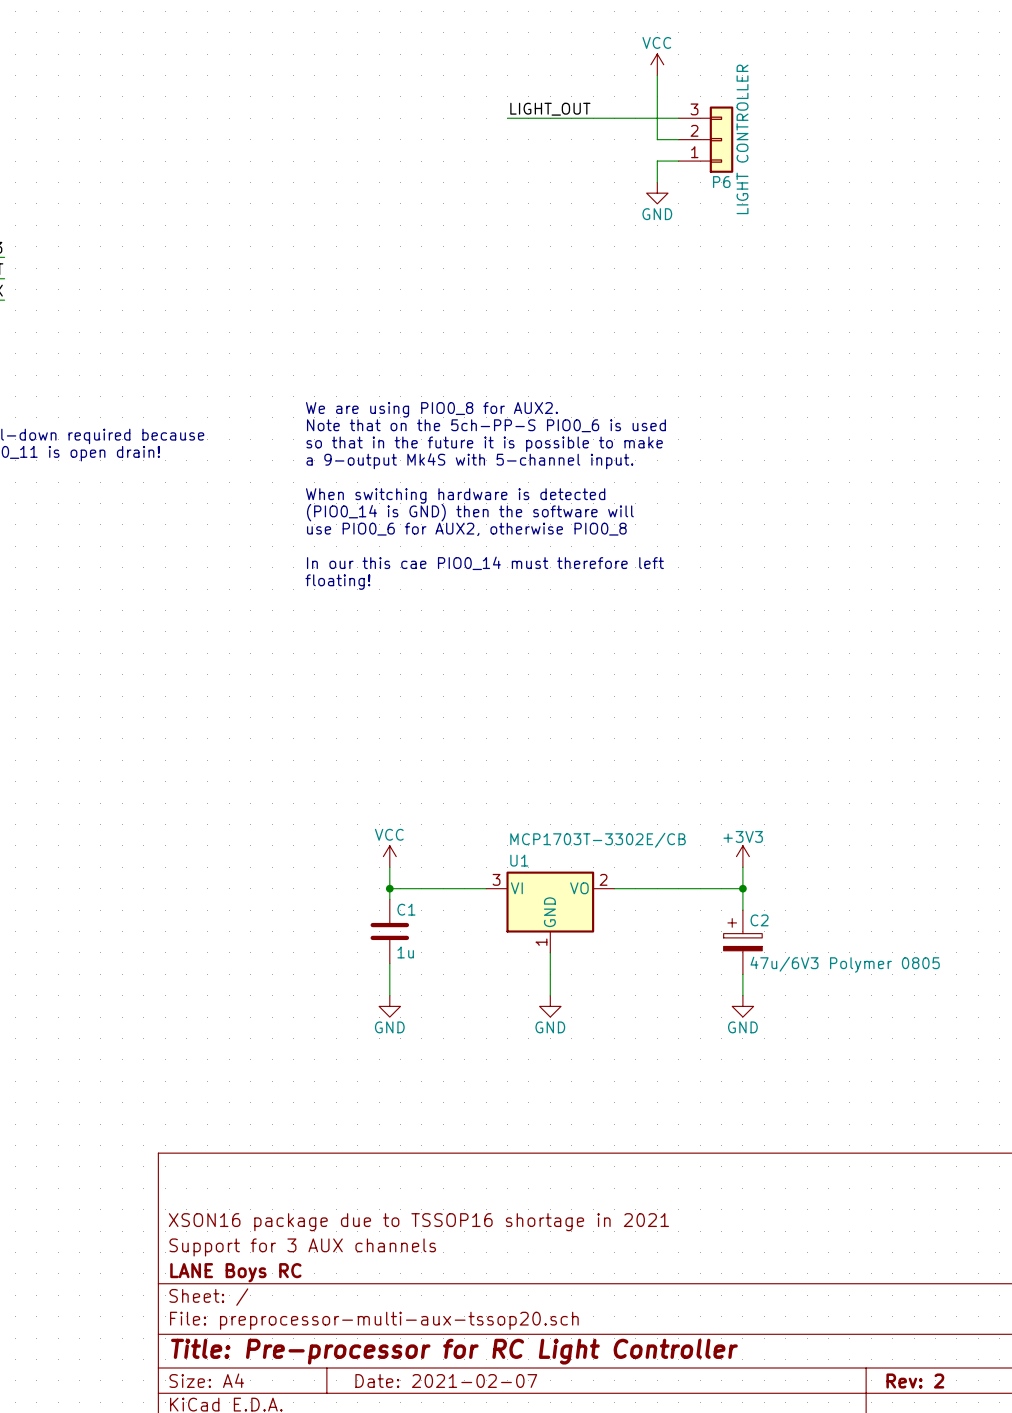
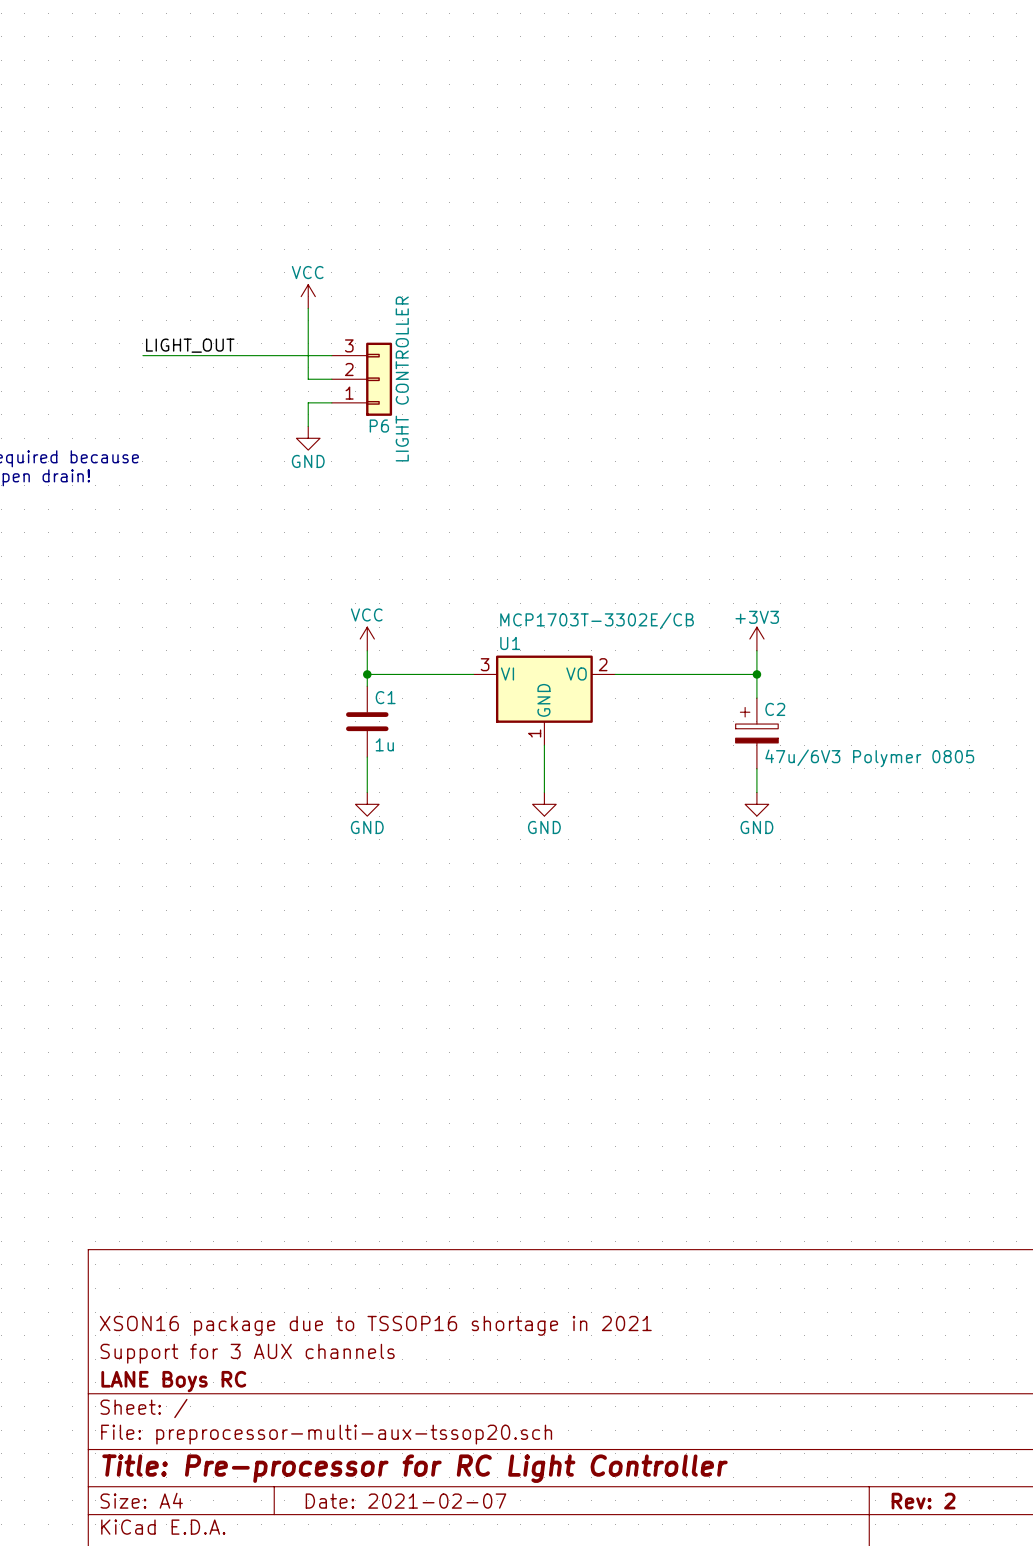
power symbol: VCC (657, 64) -> none
wire: (657, 75) (657, 139) (678, 139) -> none
label: LIGHT_OUT (550, 109) -> none
wire: (507, 118) (678, 118) -> none
P6 position: (706, 139) -> (361, 379)
wire: (678, 161) (657, 161) (657, 182) -> none
power symbol: GND (657, 193) -> none
power symbol: none -> VCC (308, 296)
wire: none -> (308, 308) (308, 379) (331, 379)
label: none -> LIGHT_OUT (190, 345)
wire: none -> (142, 355) (331, 355)
wire: none -> (331, 402) (308, 402) (308, 426)
text: We are using PIO0_8 for AUX2. (431, 409) -> none
power symbol: none -> GND (308, 438)
text: Note that on the 5ch-PP-S PIO0_6 is used (486, 425) -> none
text: so that in the future it is possible to make (484, 444) -> none
text: a 9-output Mk4S with 5-channel input. (469, 461) -> none
text: When switching hardware is detected (455, 495) -> none
text: (PIO0_14 is GND) then the software will (470, 512) -> none
text: use PIO0_6 for AUX2, otherwise PIO0_8 (466, 529) -> none
text: In our this cae PIO0_14 must therefore left (485, 563) -> none
text: floating! (337, 582) -> none
power symbol: none -> VCC (367, 639)
power symbol: none -> +3V3 (756, 639)
wire: none -> (367, 650) (367, 686)
wire: none -> (756, 650) (756, 698)
wire: none -> (367, 674) (473, 674)
junction: none -> (367, 674)
wire: none -> (615, 674) (756, 674)
junction: none -> (756, 674)
wire: none -> (544, 745) (544, 792)
wire: none -> (756, 768) (756, 792)
power symbol: none -> GND (367, 804)
power symbol: none -> GND (544, 804)
power symbol: none -> GND (756, 804)
power symbol: VCC (389, 856) -> none
power symbol: +3V3 (742, 856) -> none
wire: (389, 867) (389, 899) -> (367, 757) (367, 792)
wire: (742, 867) (742, 910) -> none
wire: (389, 888) (486, 888) -> none
junction: (389, 888) -> none
wire: (614, 888) (742, 888) -> none
junction: (742, 888) -> none
U1 position: (550, 912) -> (544, 700)
C1 position: (389, 931) -> (367, 721)
C2 position: (742, 942) -> (756, 733)
wire: (550, 952) (550, 995) -> none
wire: (389, 963) (389, 995) -> none
wire: (742, 974) (742, 995) -> none
power symbol: GND (389, 1006) -> none
power symbol: GND (550, 1006) -> none
power symbol: GND (742, 1006) -> none

